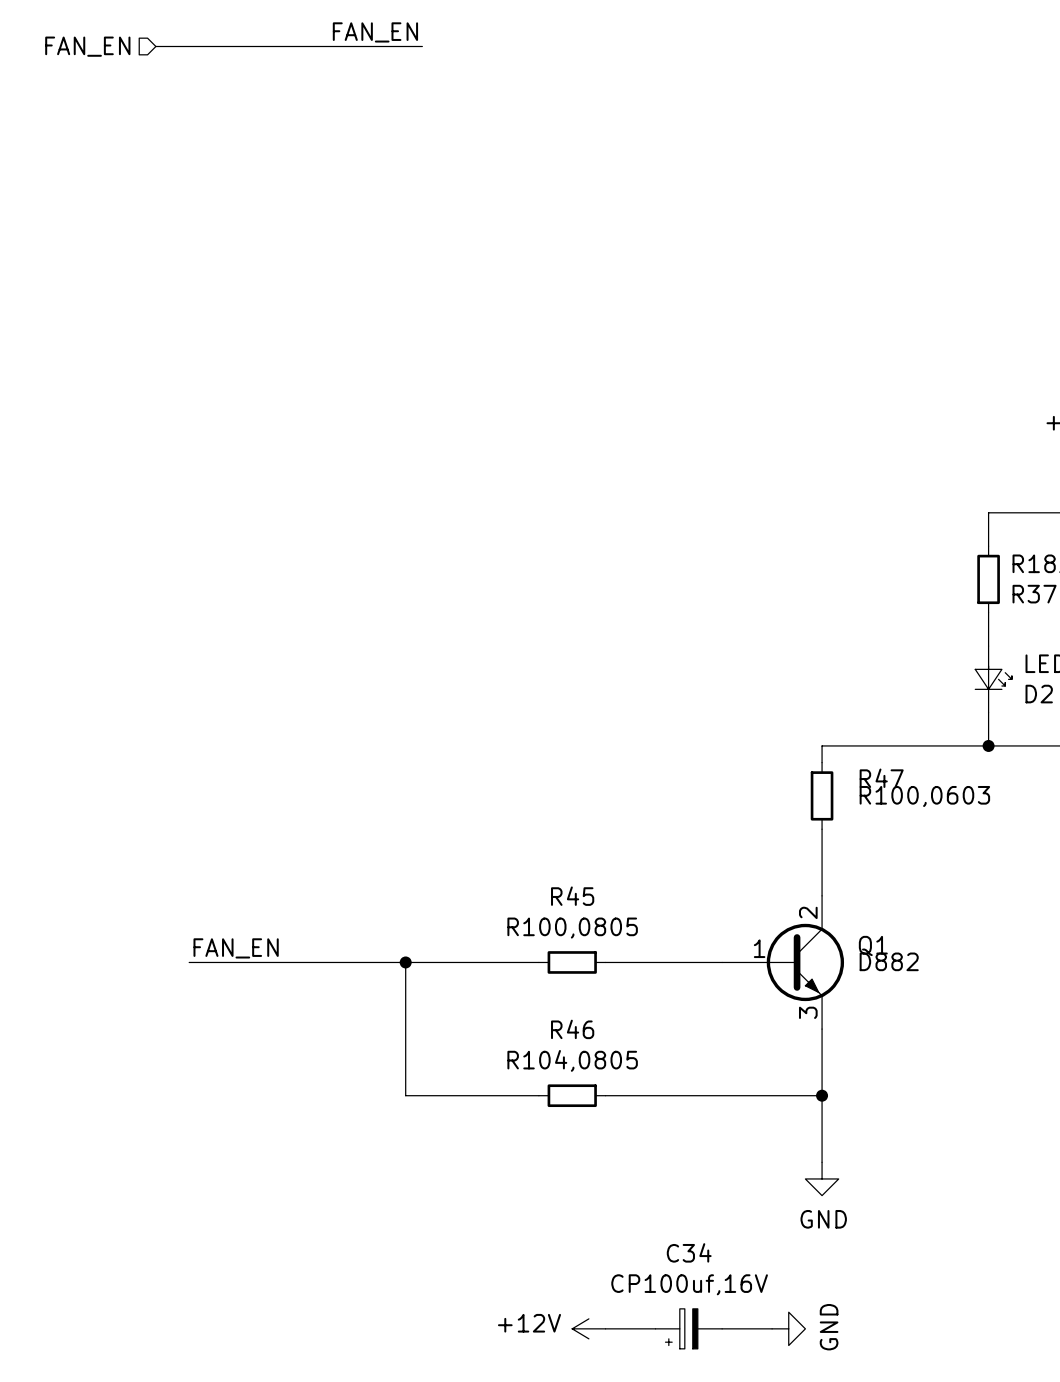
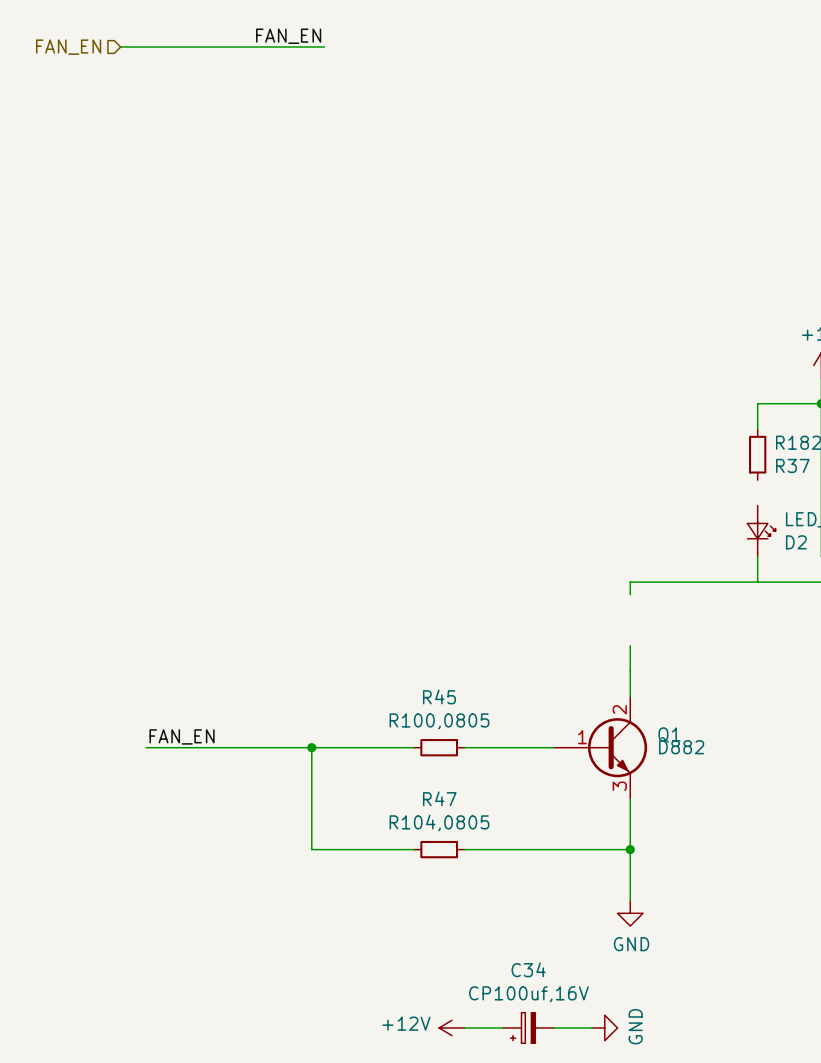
wire: (988, 612) (988, 646) -> none
junction: (988, 745) -> none
R47: R100,0603 (822, 795) -> none
R46 name: R46 (572, 1029) -> R47 (439, 798)

